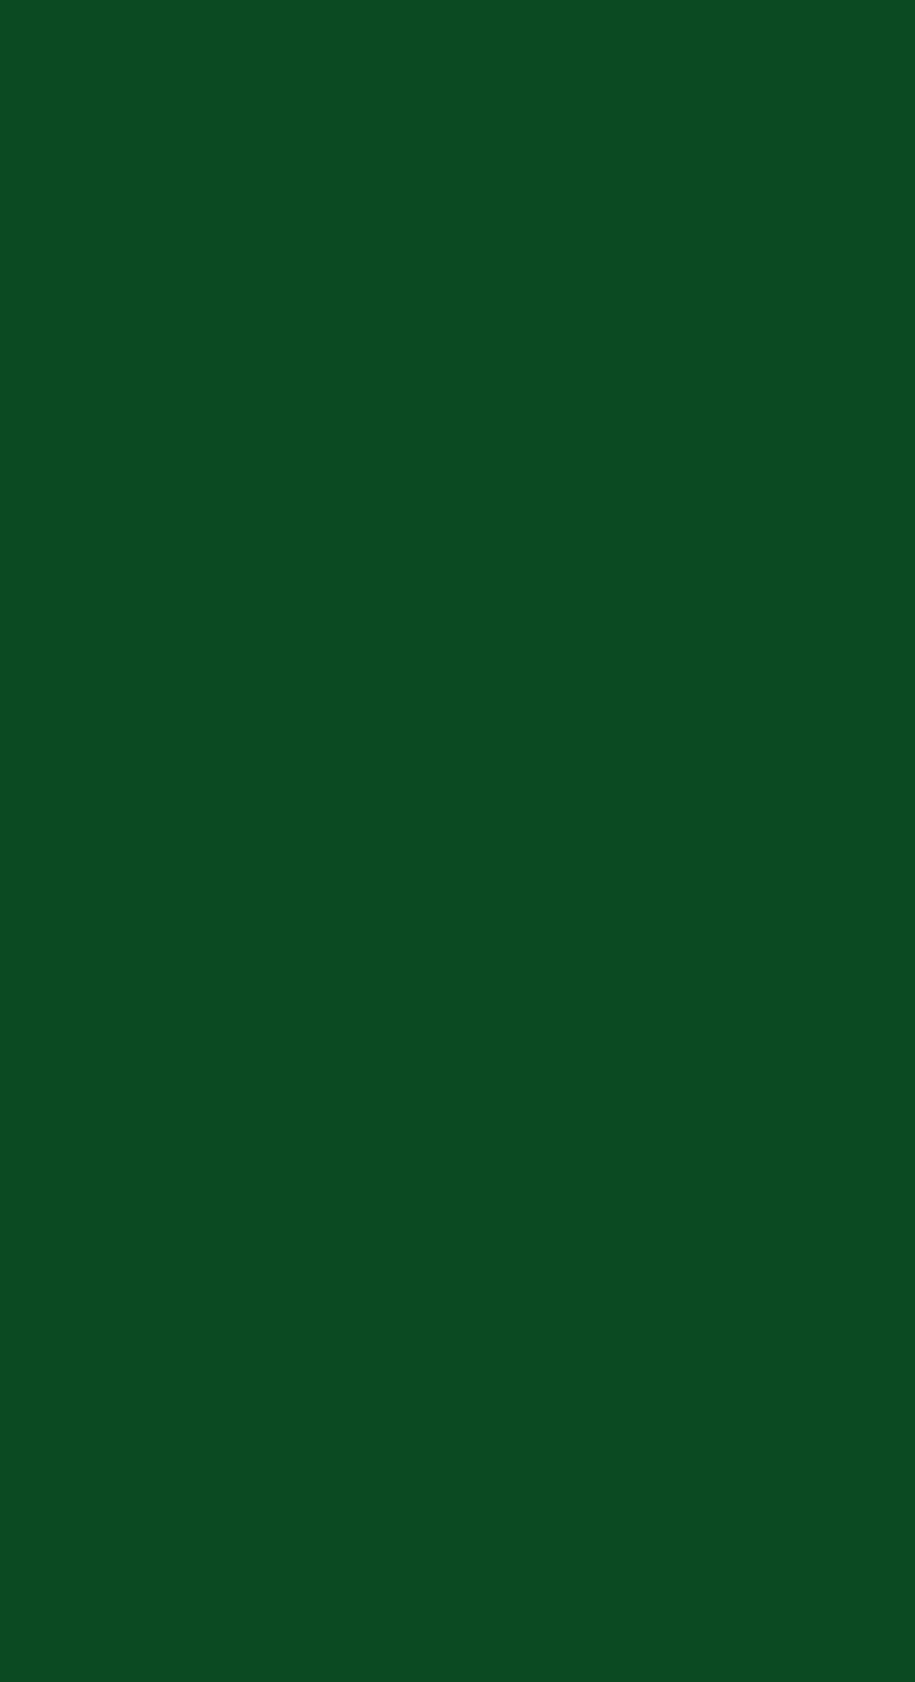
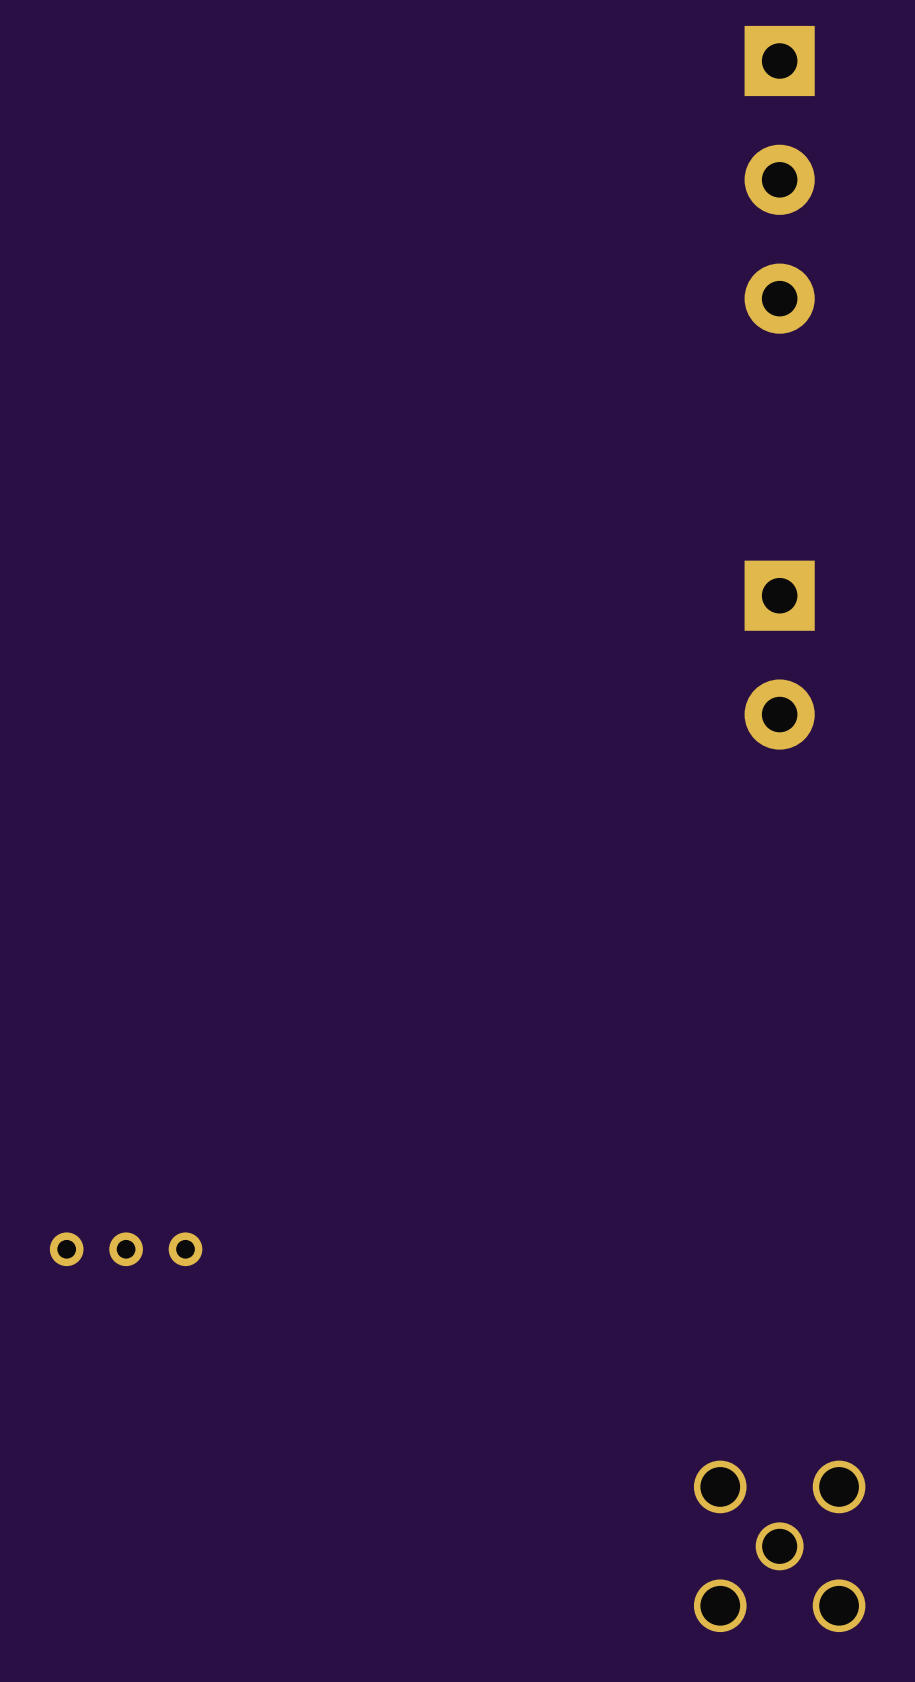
part: none -> (779, 179)
part: none -> (779, 655)
part: none -> (126, 1249)
part: none -> (779, 1546)

